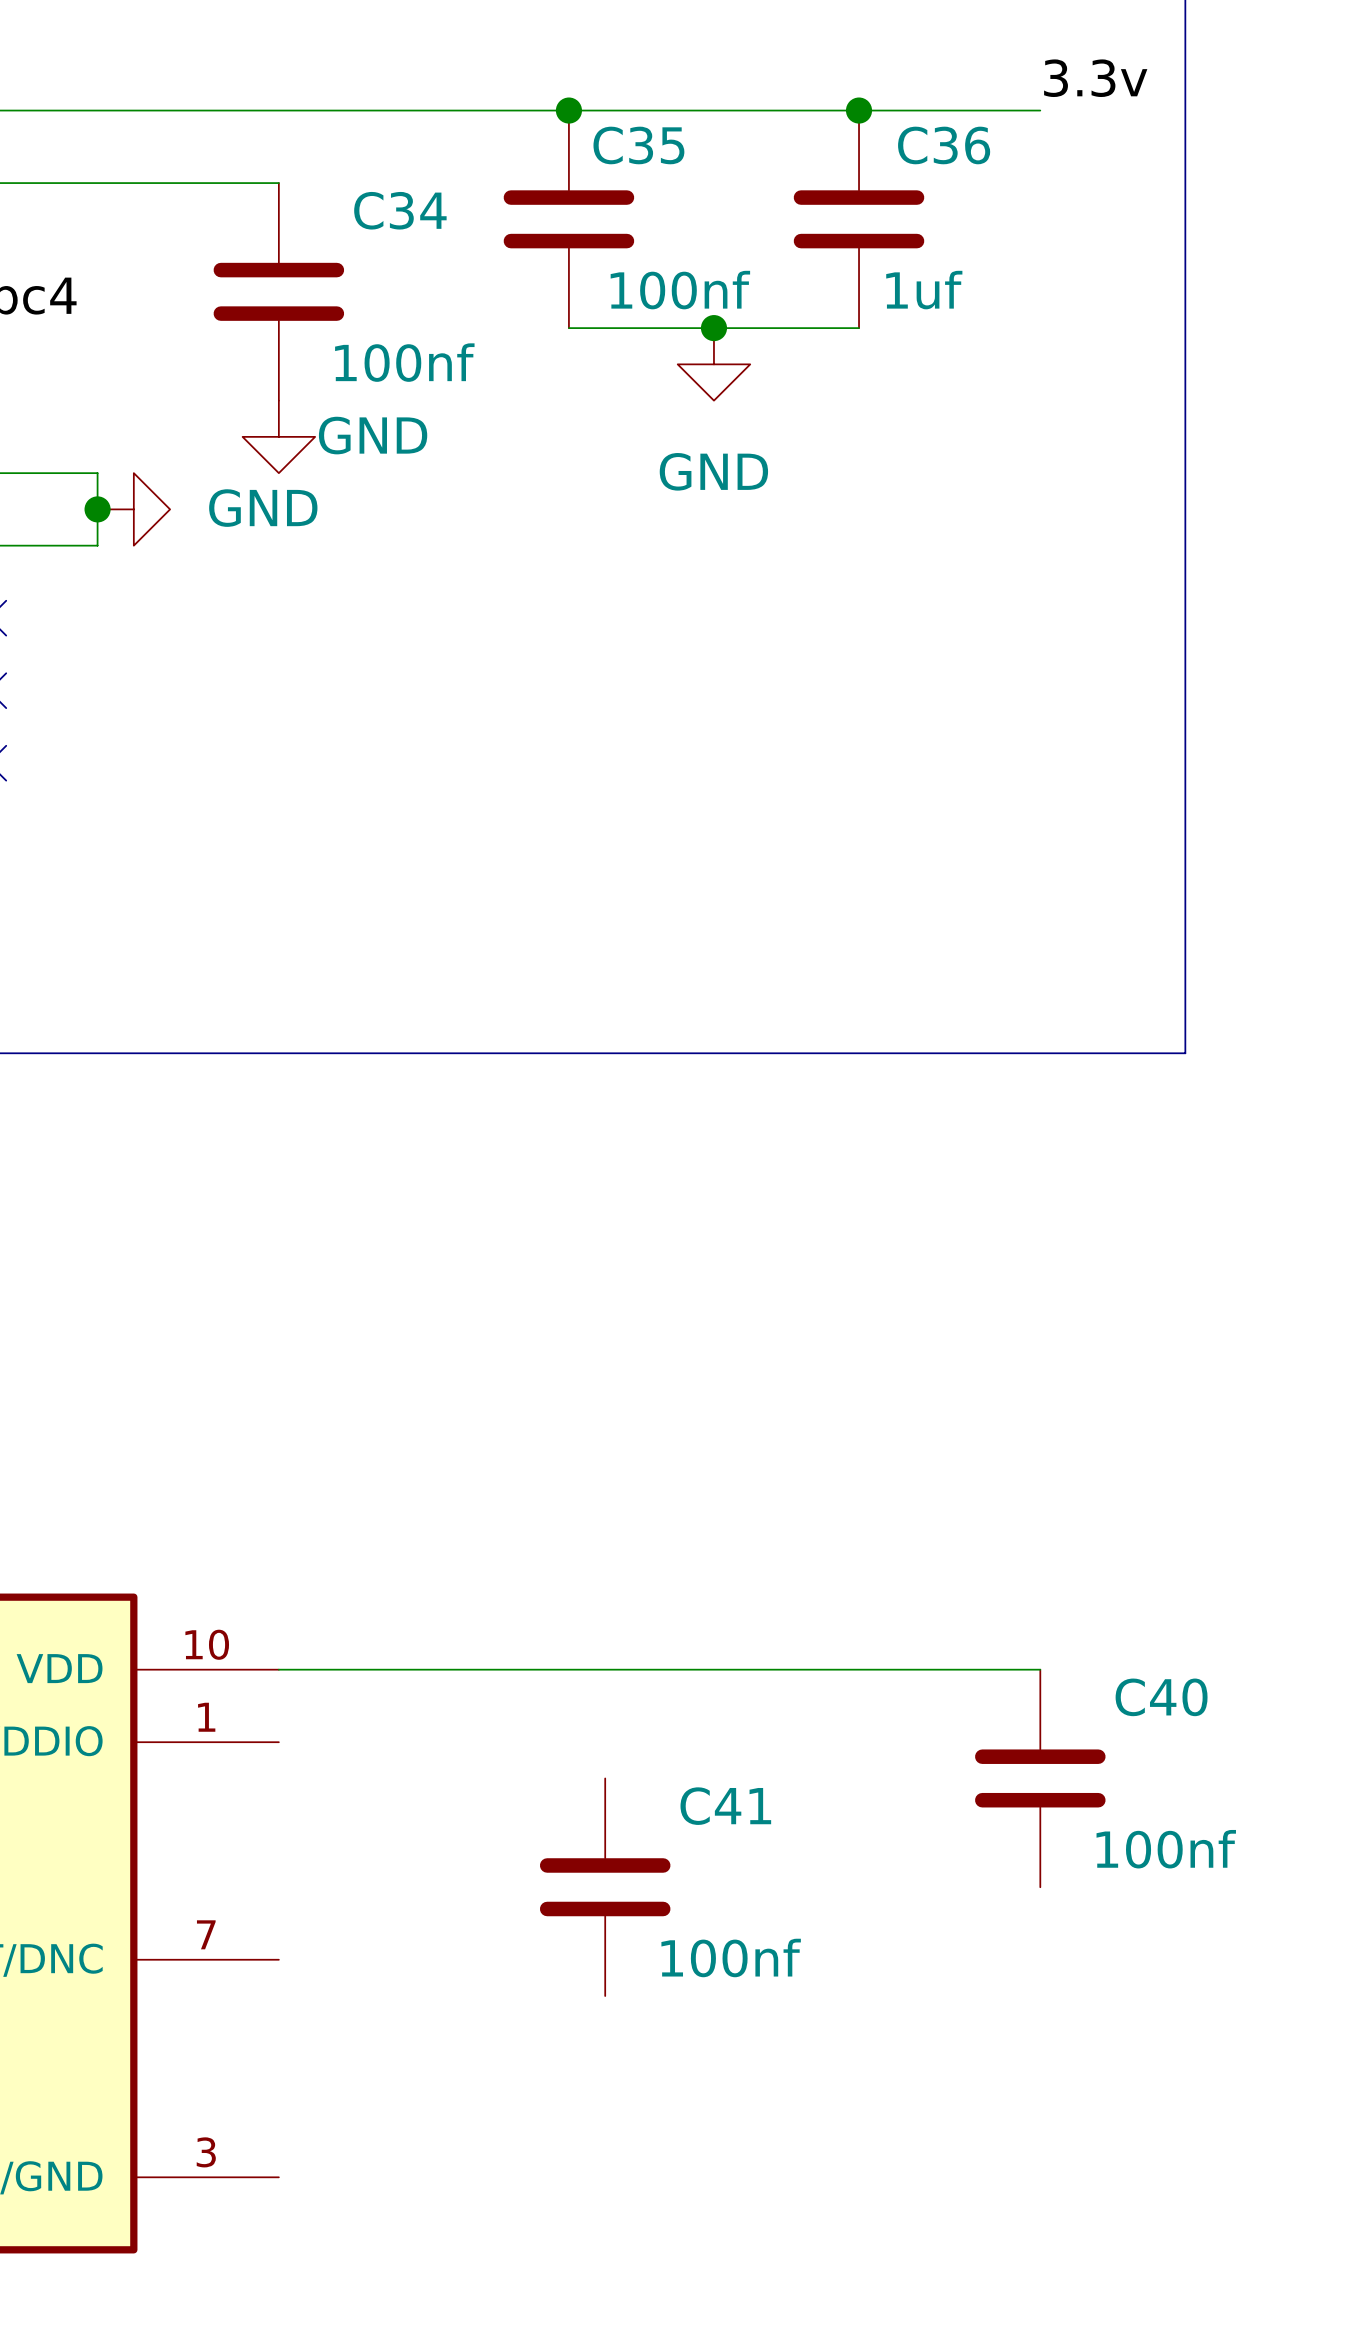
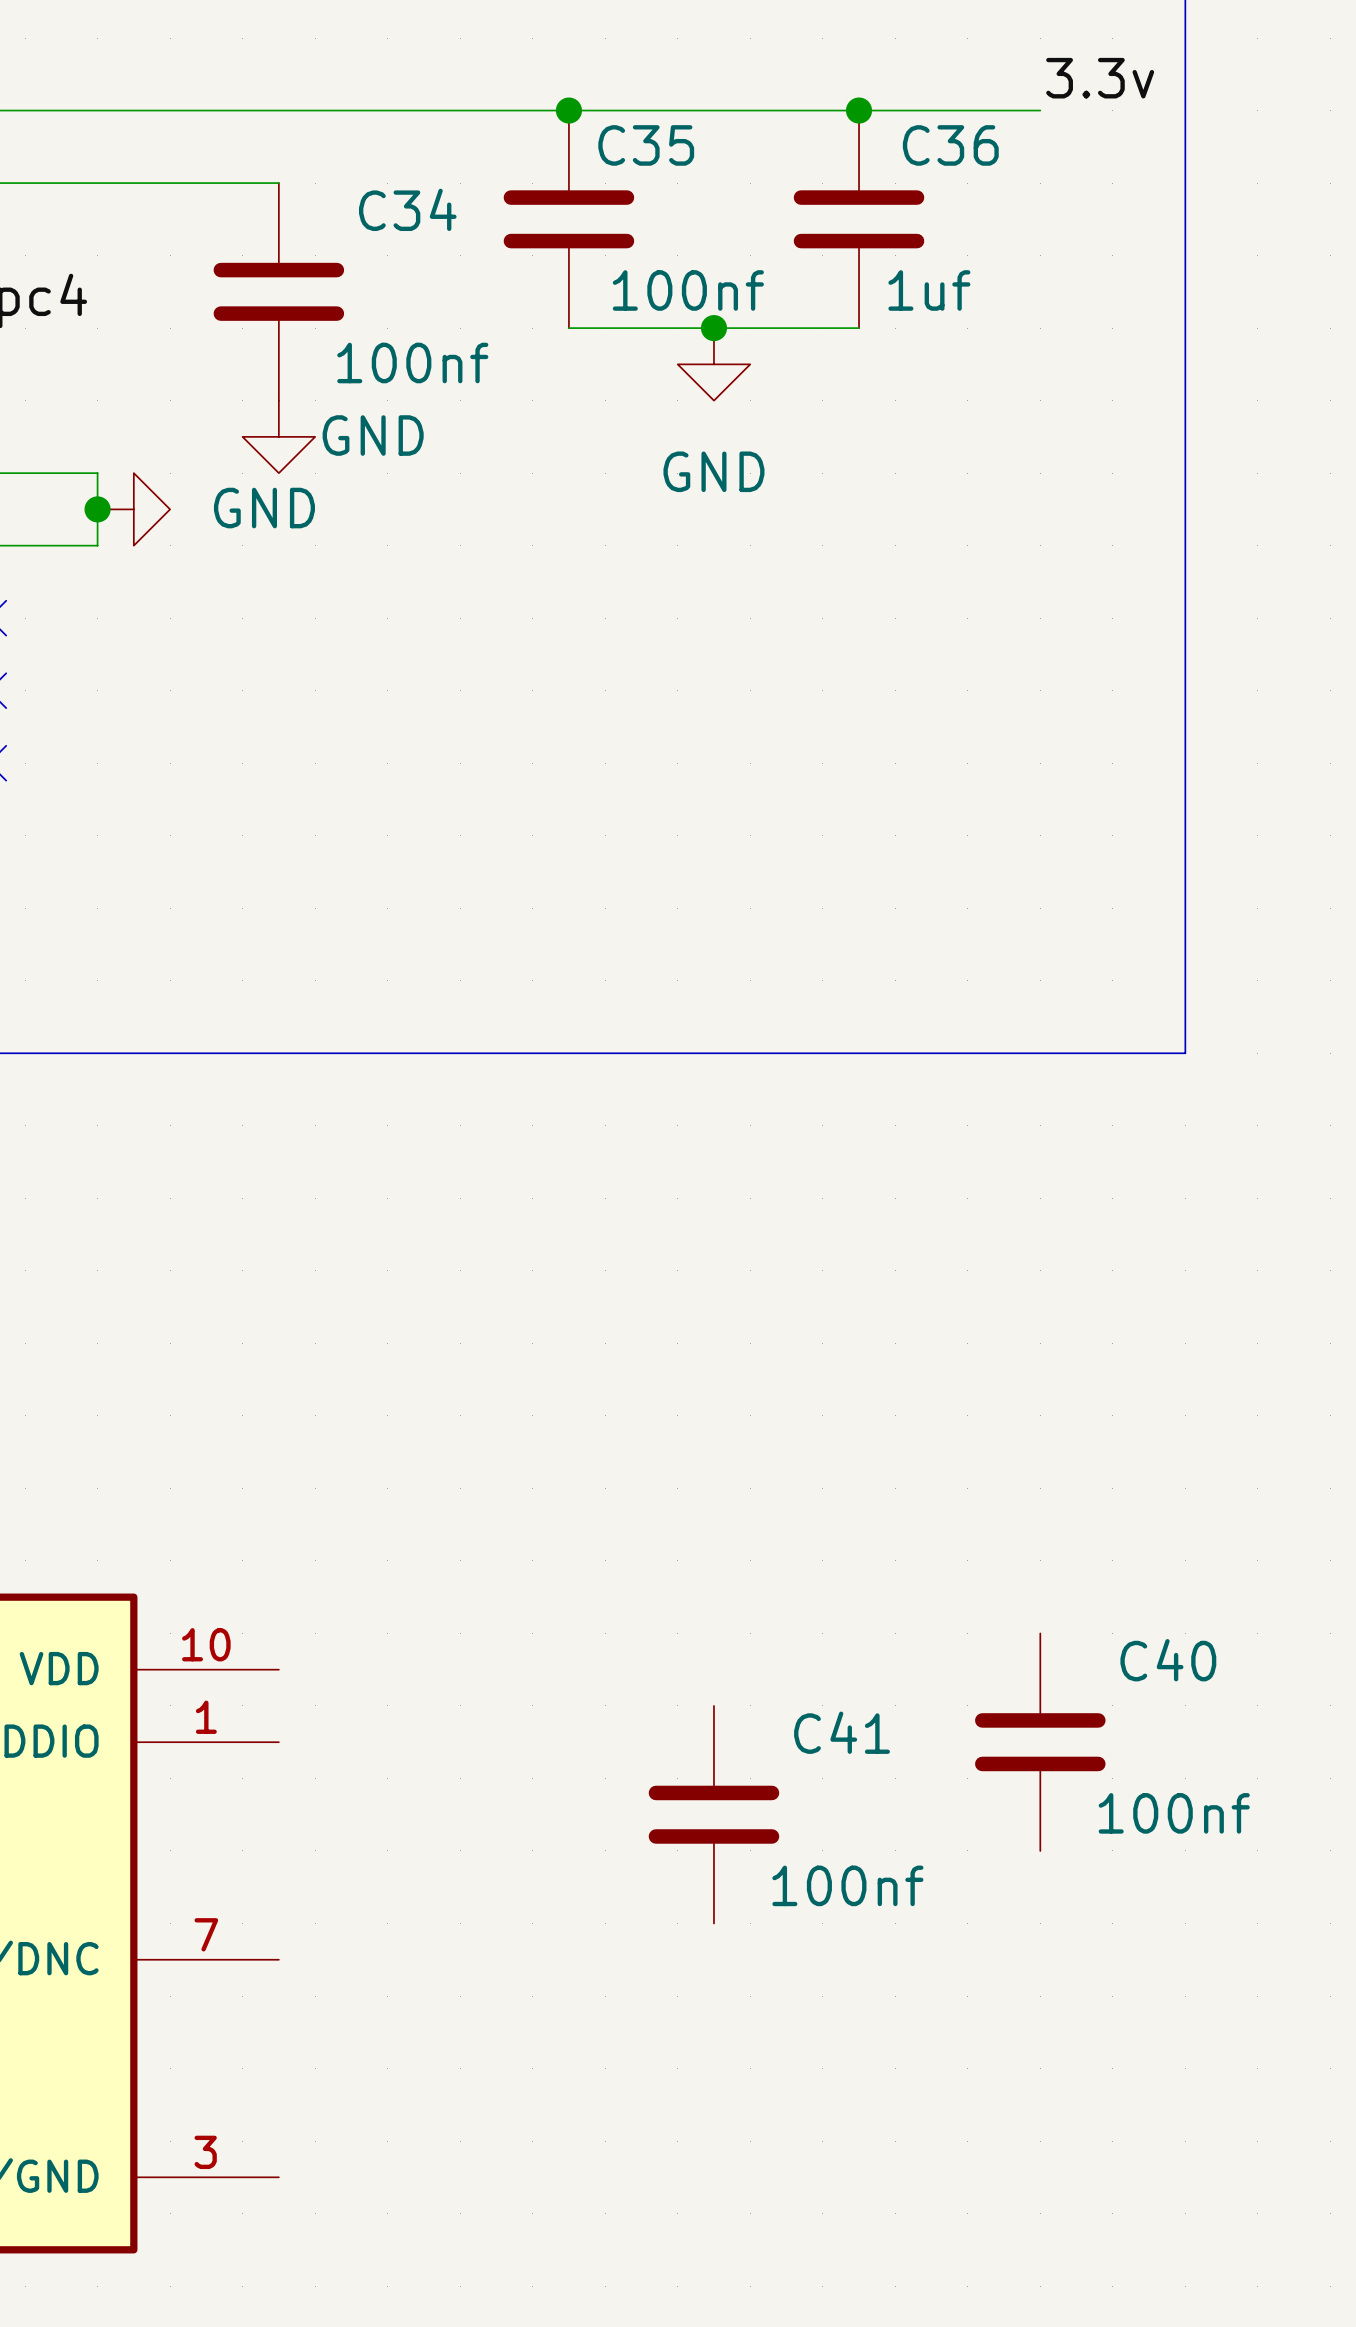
wire: (278, 1669) (1040, 1669) -> none
C40 position: (1040, 1778) -> (1040, 1742)
C41 position: (605, 1887) -> (713, 1814)

